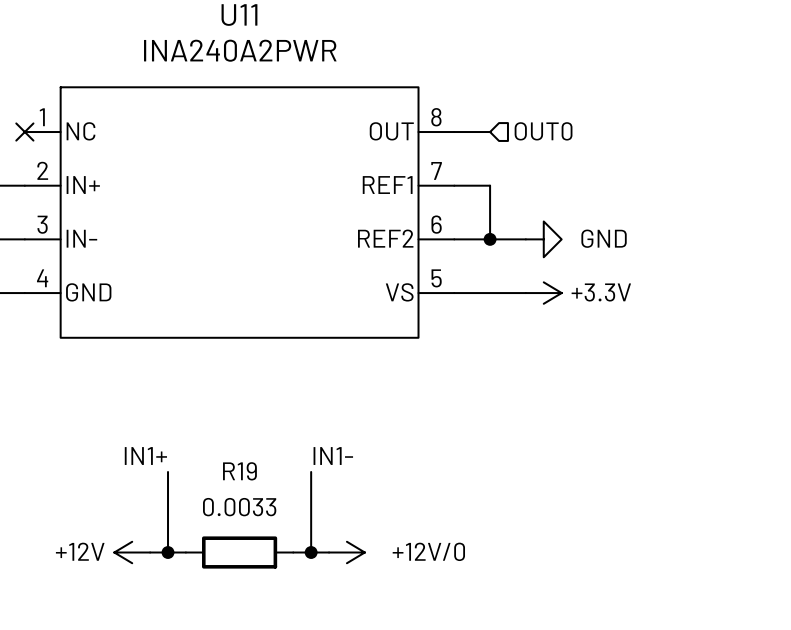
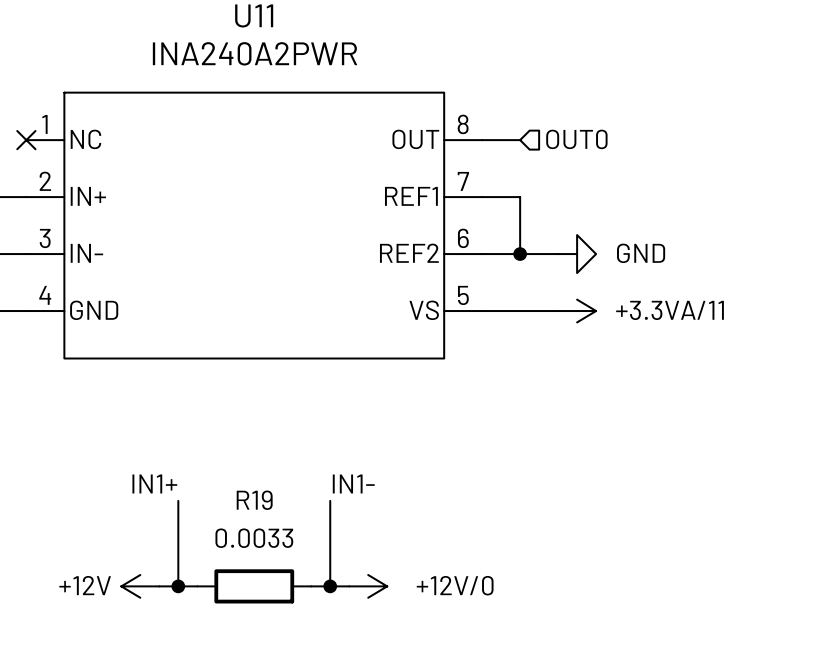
power symbol: +3.3V (543, 293) -> +3.3VA/11 (577, 311)

